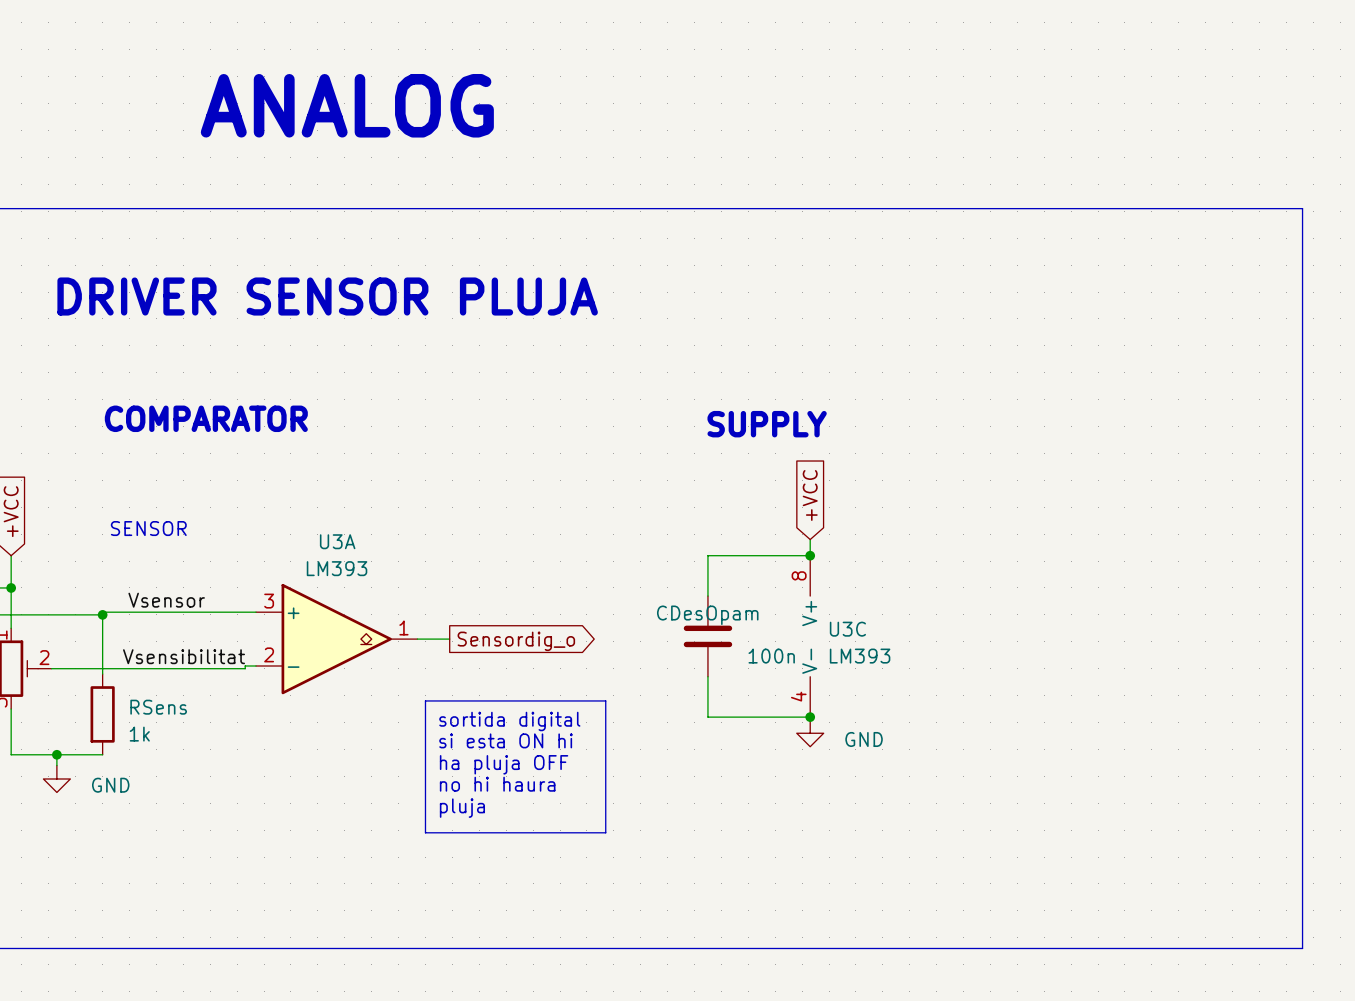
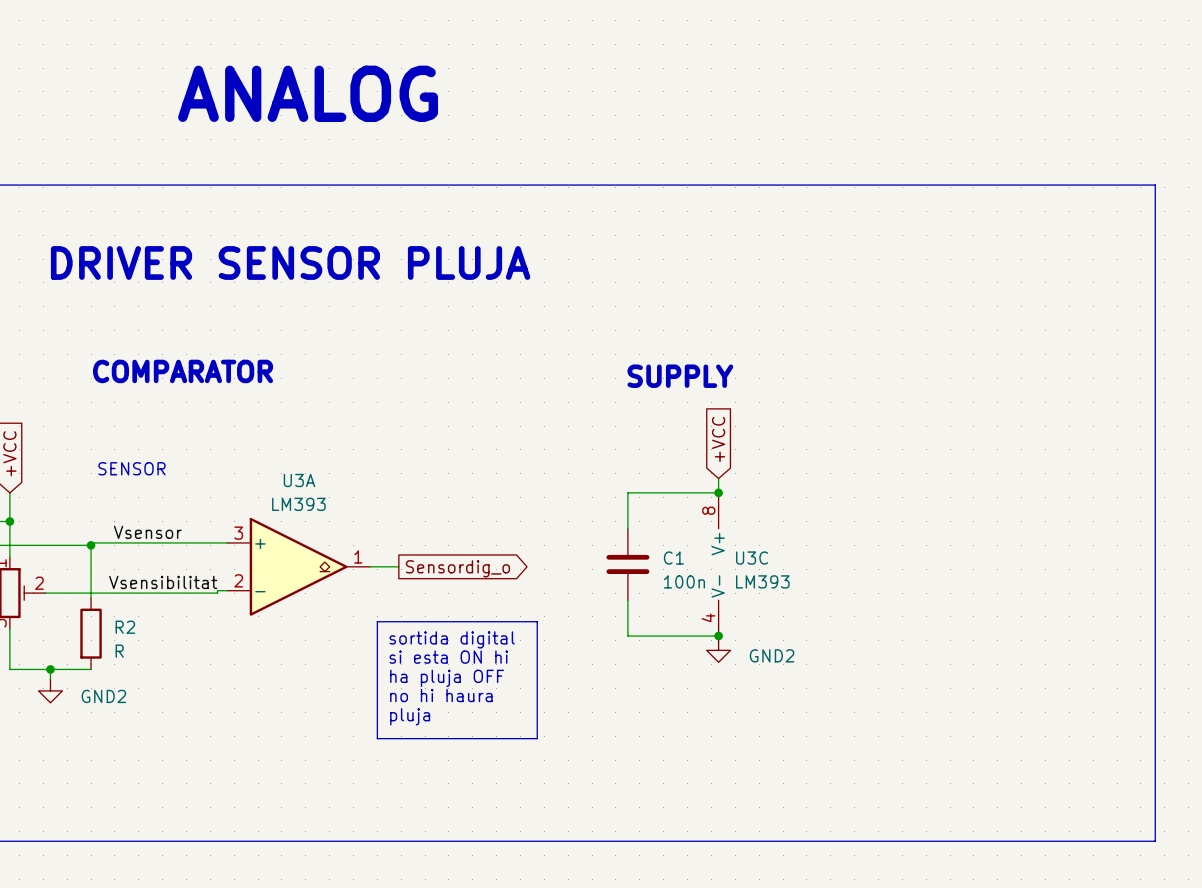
CDesOpam name: CDesOpam (707, 615) -> C1 (673, 558)
RSens name: RSens (158, 707) -> R2 (125, 627)
power symbol: GND (810, 733) -> GND2 (718, 650)
RSens value: 1k (139, 734) -> R (119, 651)
power symbol: GND (56, 778) -> GND2 (50, 690)

